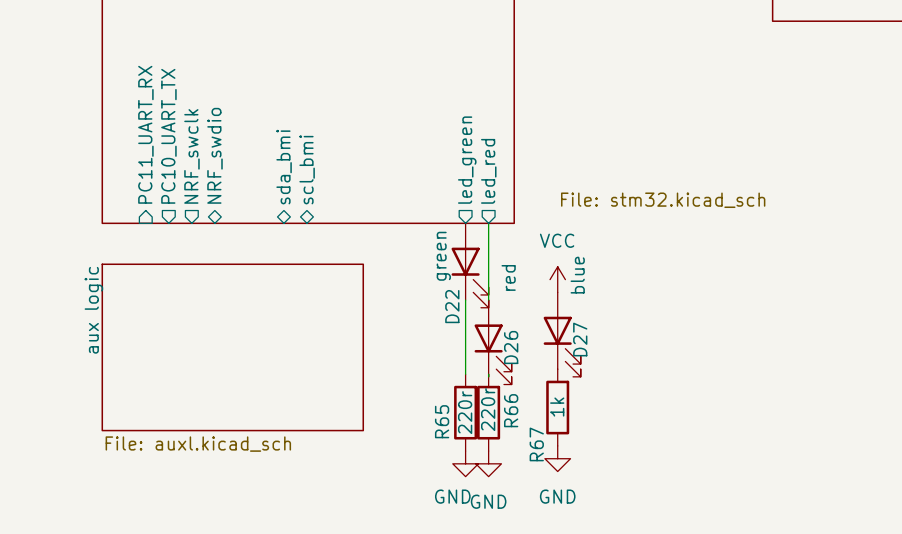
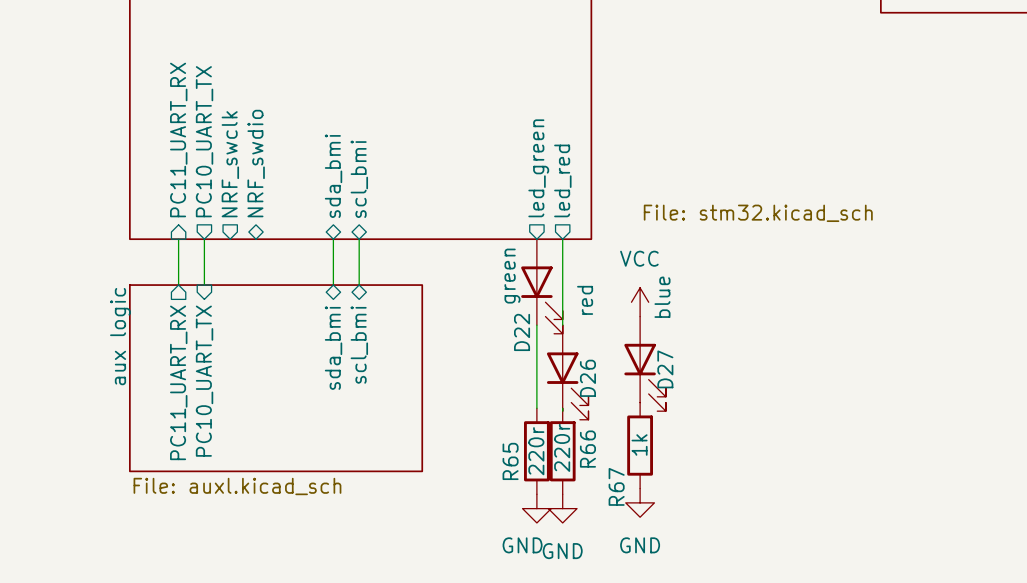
wire: none -> (178, 239) (178, 285)
wire: none -> (204, 239) (204, 285)
wire: none -> (333, 239) (333, 285)
wire: none -> (359, 239) (359, 285)
sheet pin: none -> scl_bmi (359, 344)
sheet pin: none -> sda_bmi (333, 348)
sheet pin: none -> PC10_UART_TX (204, 381)
sheet pin: none -> PC11_UART_RX (178, 382)

